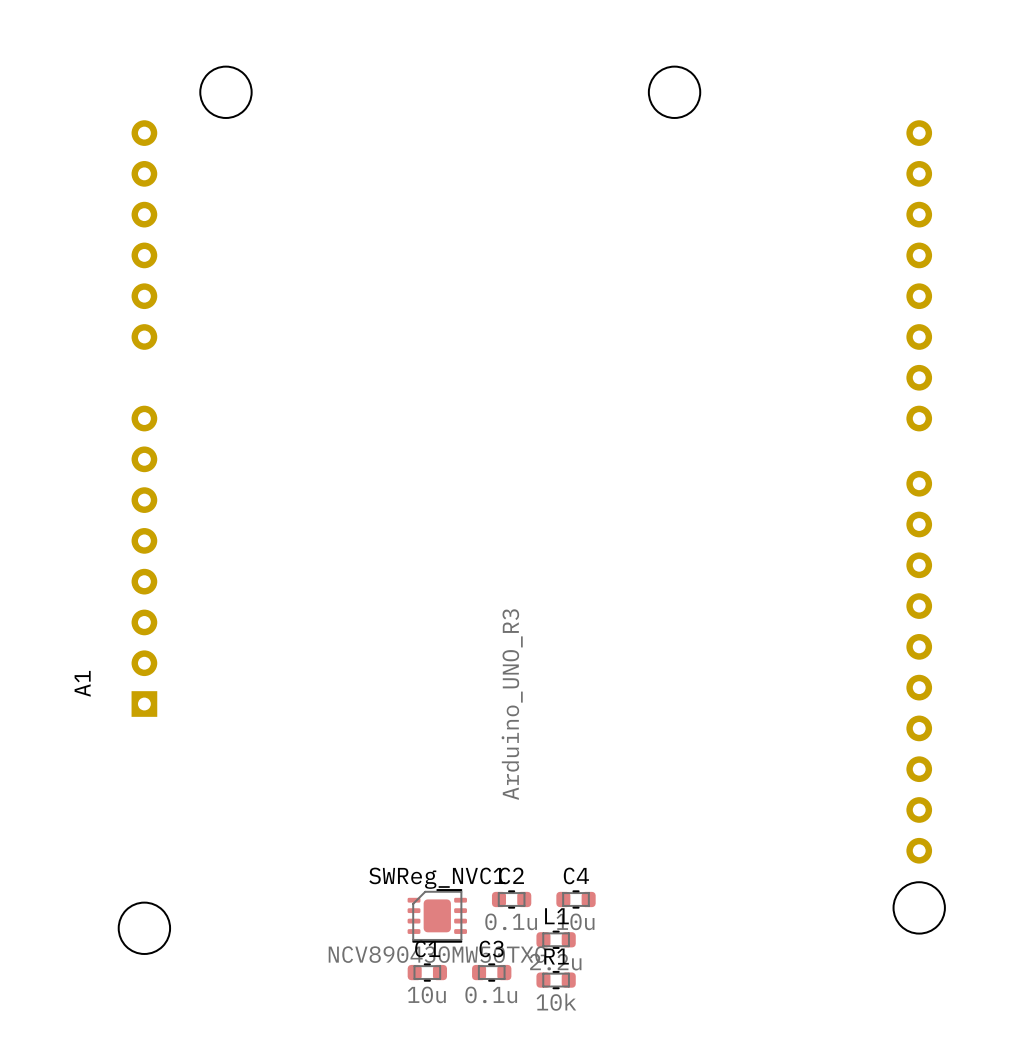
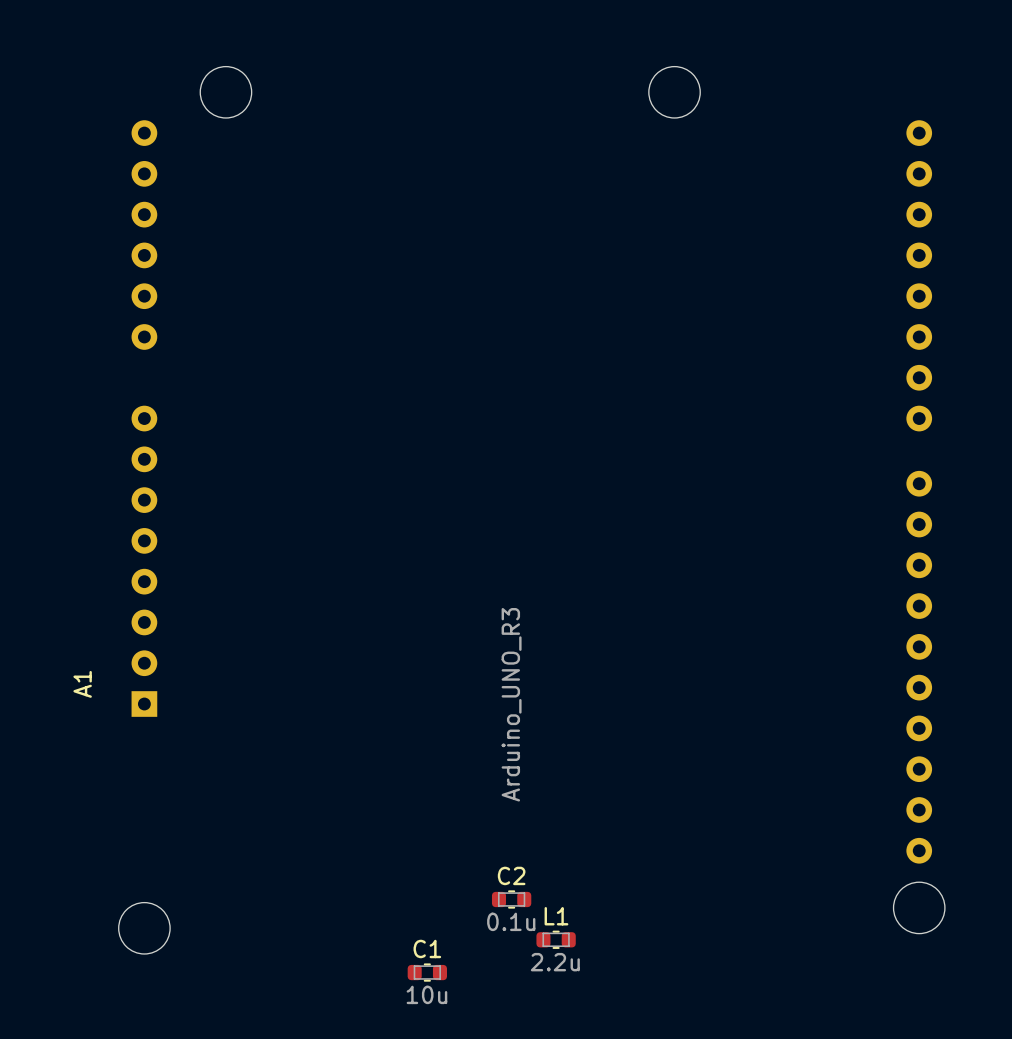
C4: 10u (576, 899) -> none
SWReg_NVC1: NCV890430MW50TXG (437, 915) -> none
C3: 0.1u (491, 972) -> none
R1: 10k (556, 980) -> none

